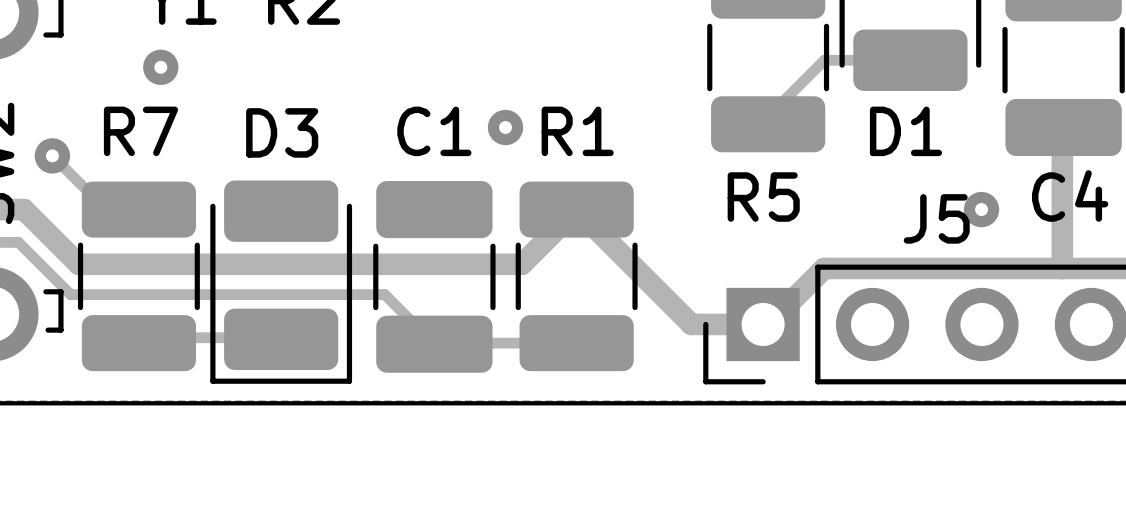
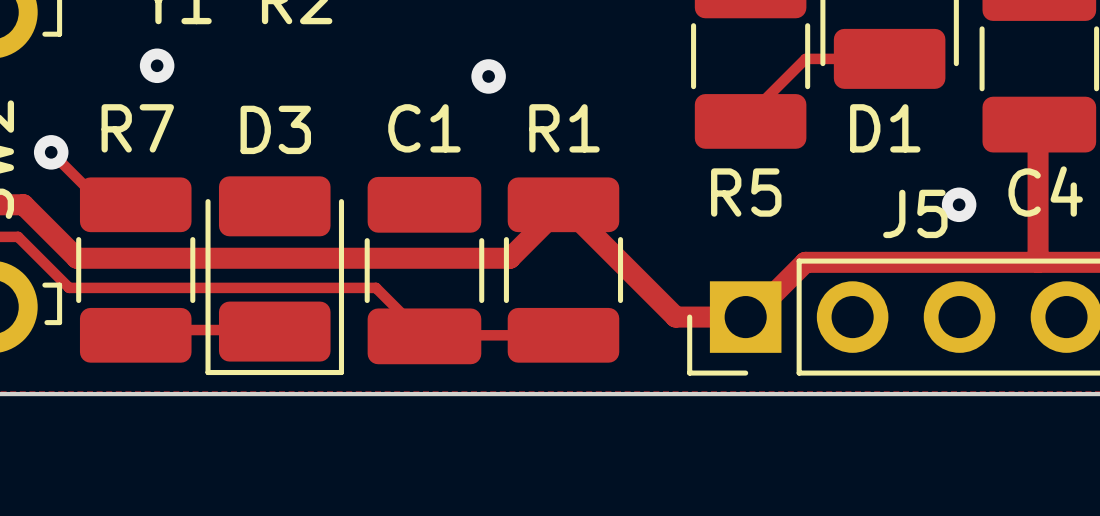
via position: (505, 127) -> (488, 76)

